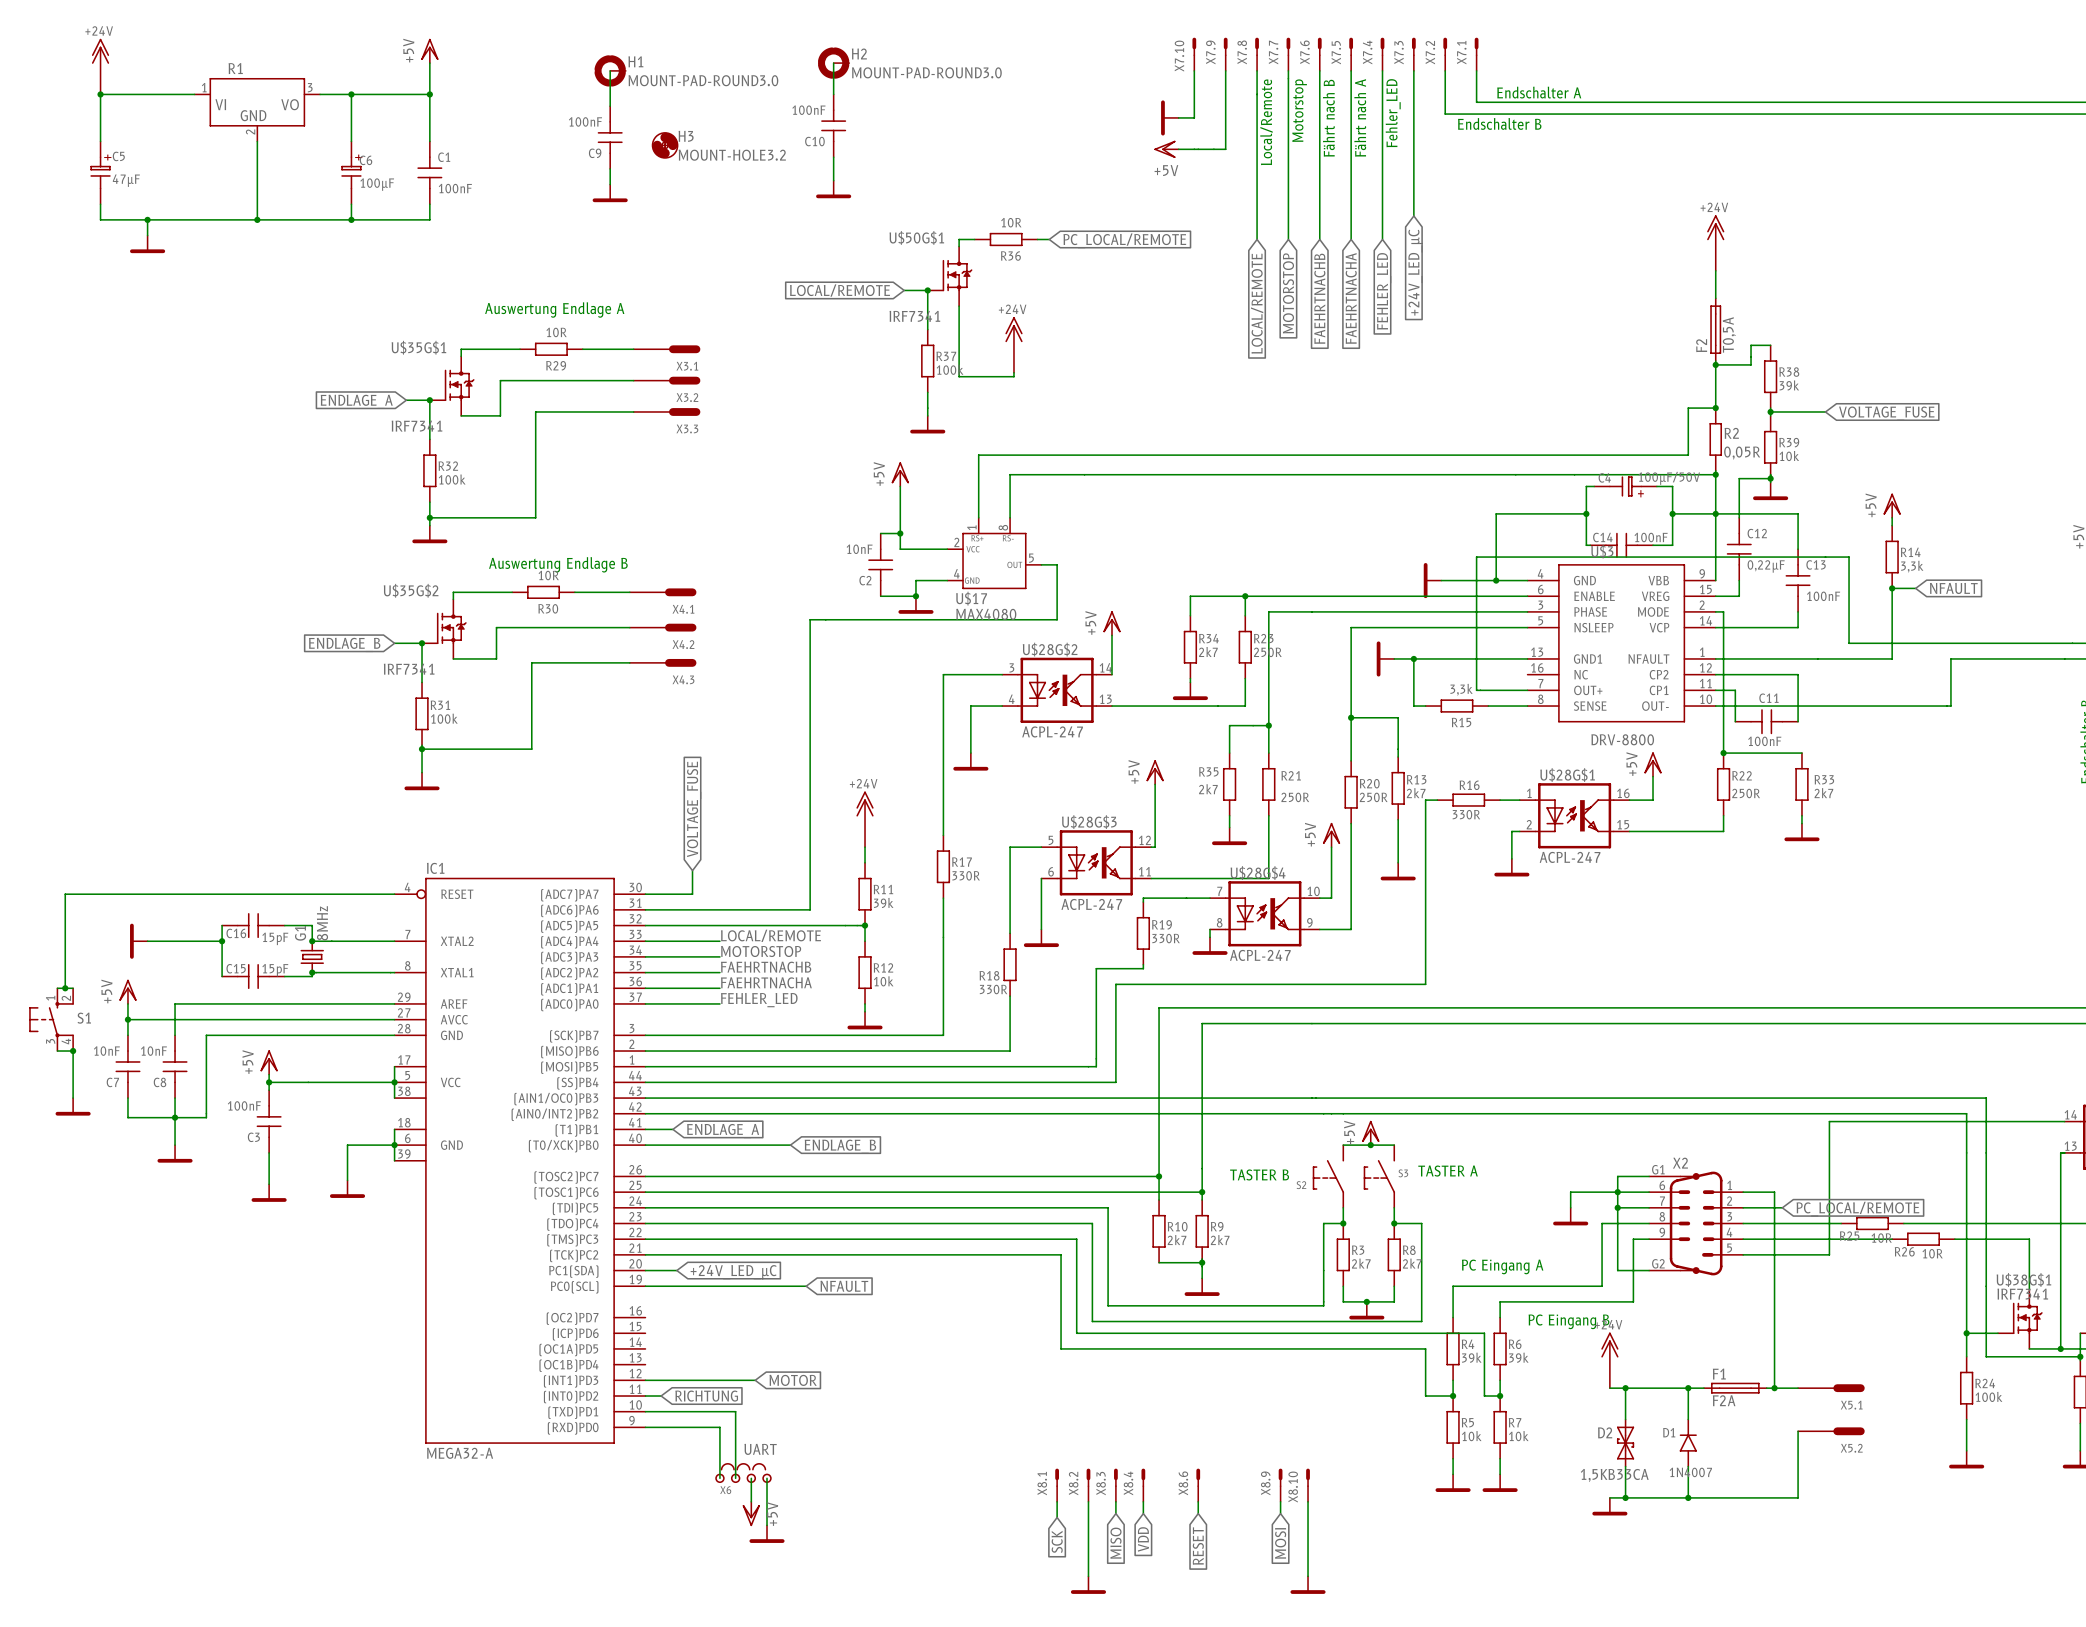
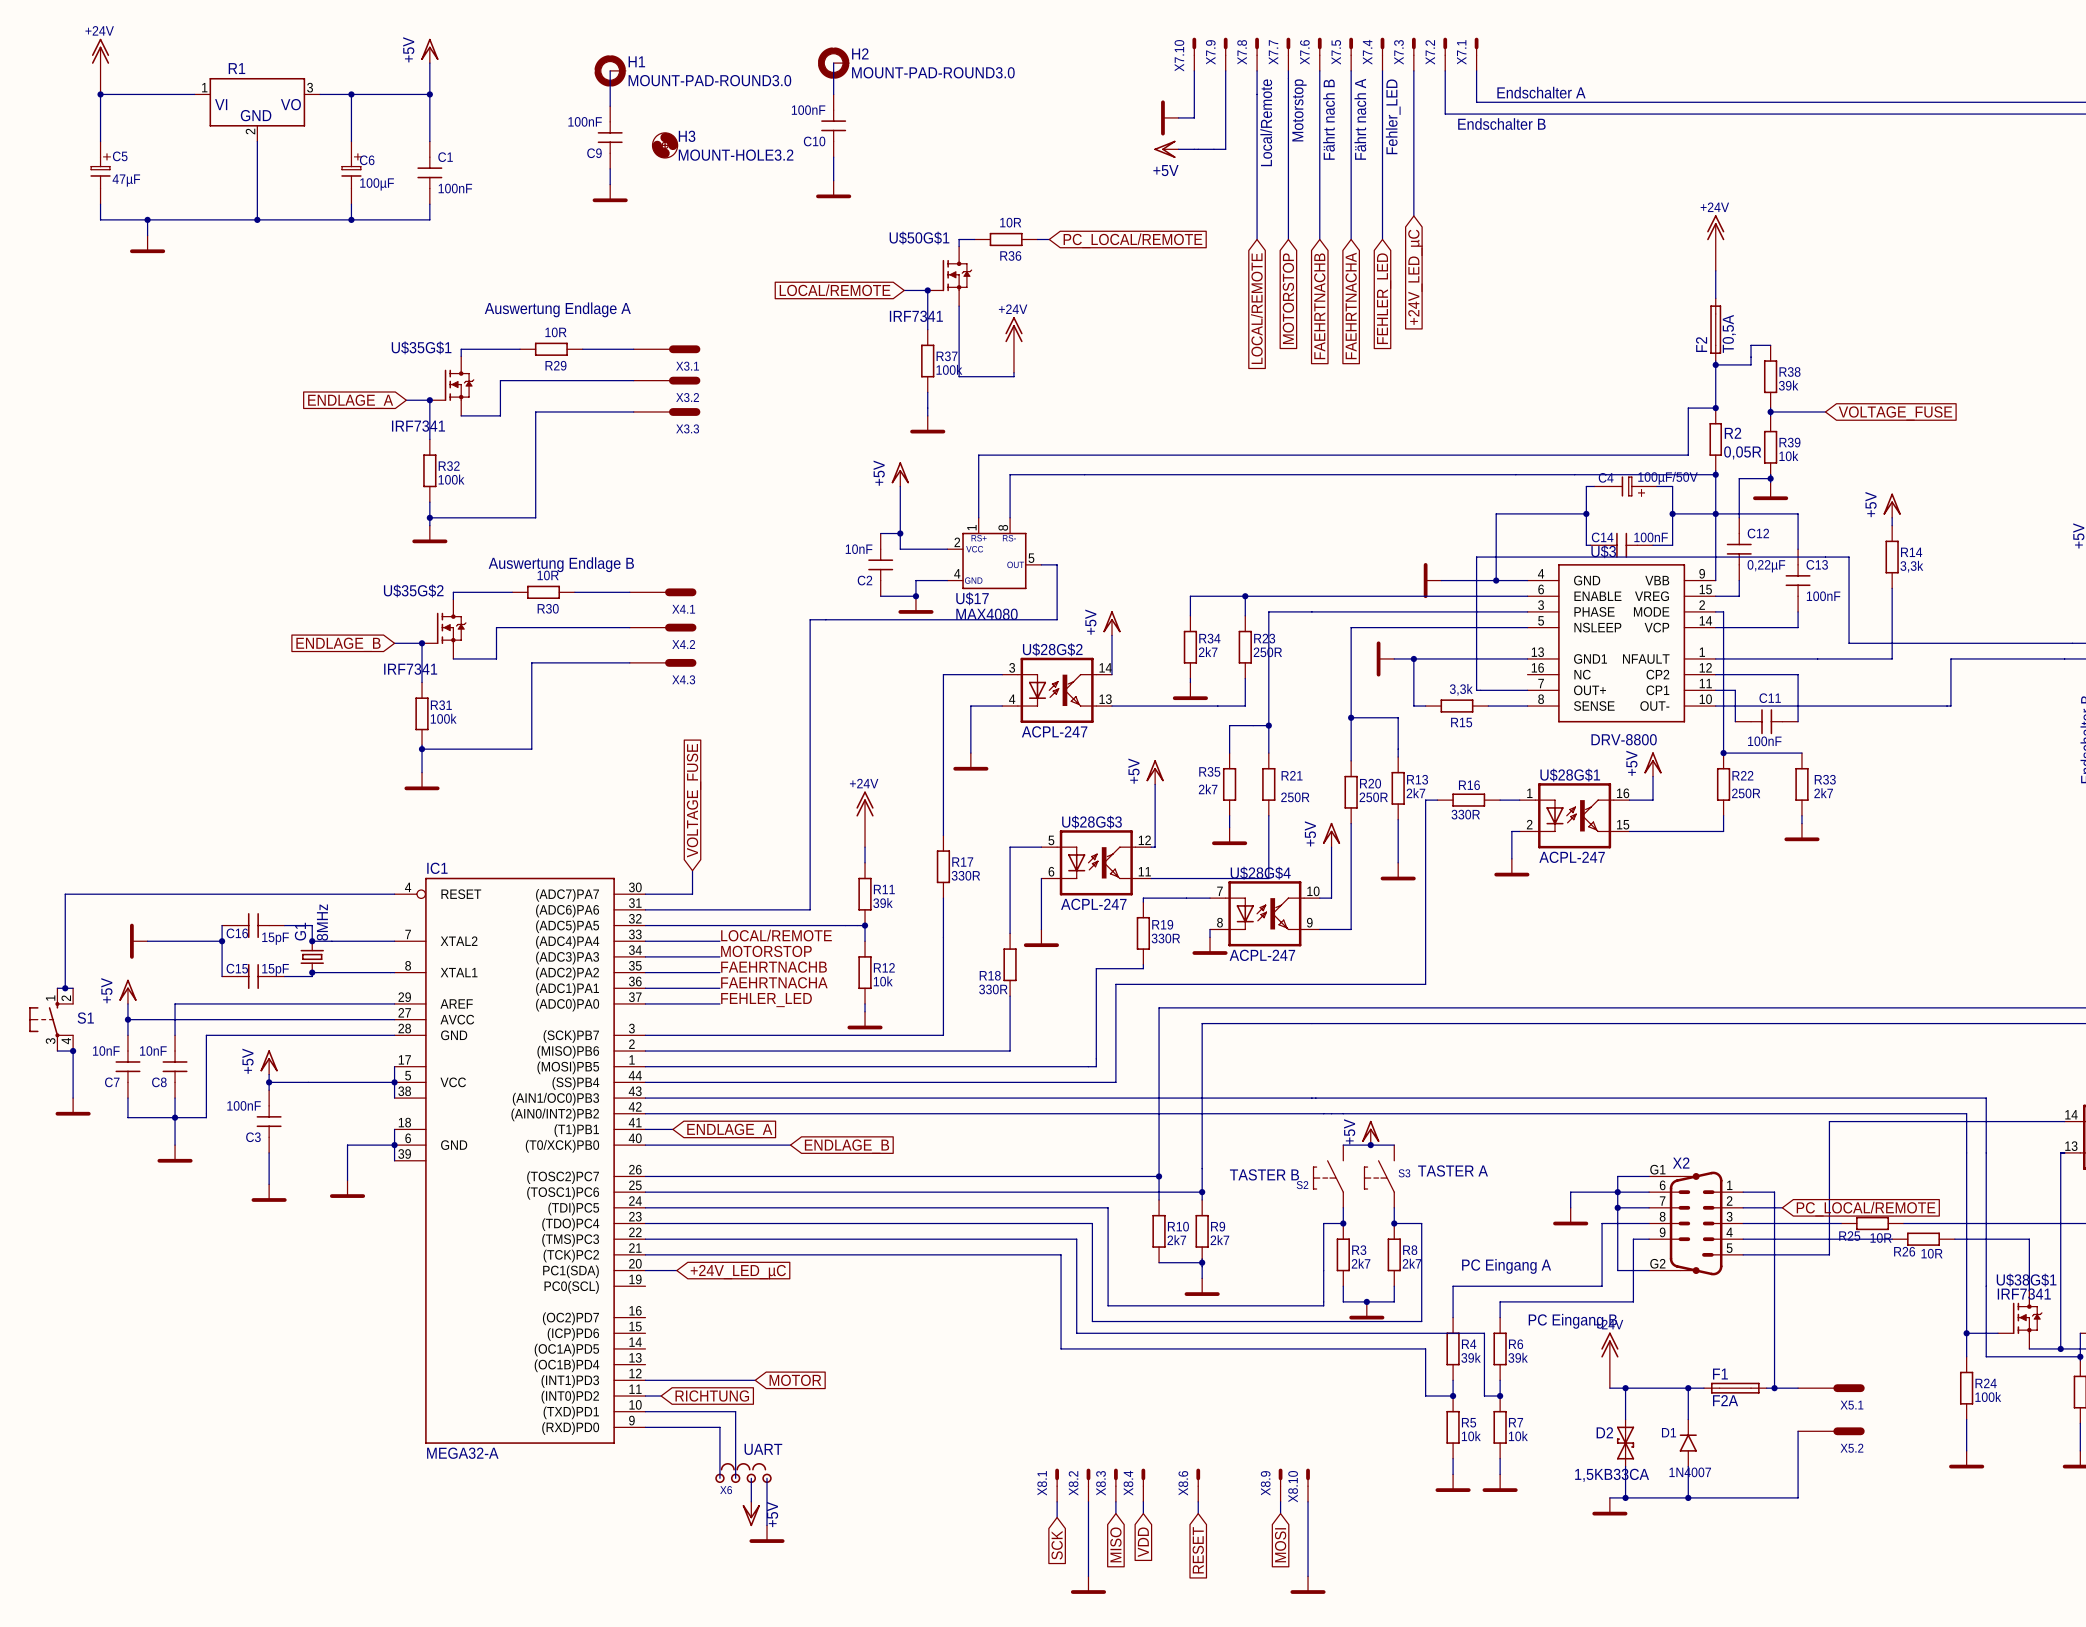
wire: (1892, 588) (1915, 588) -> none
junction: (1892, 588) -> none
global label: NFAULT (1953, 588) -> none
wire: (645, 1286) (806, 1286) -> none
global label: NFAULT (844, 1286) -> none

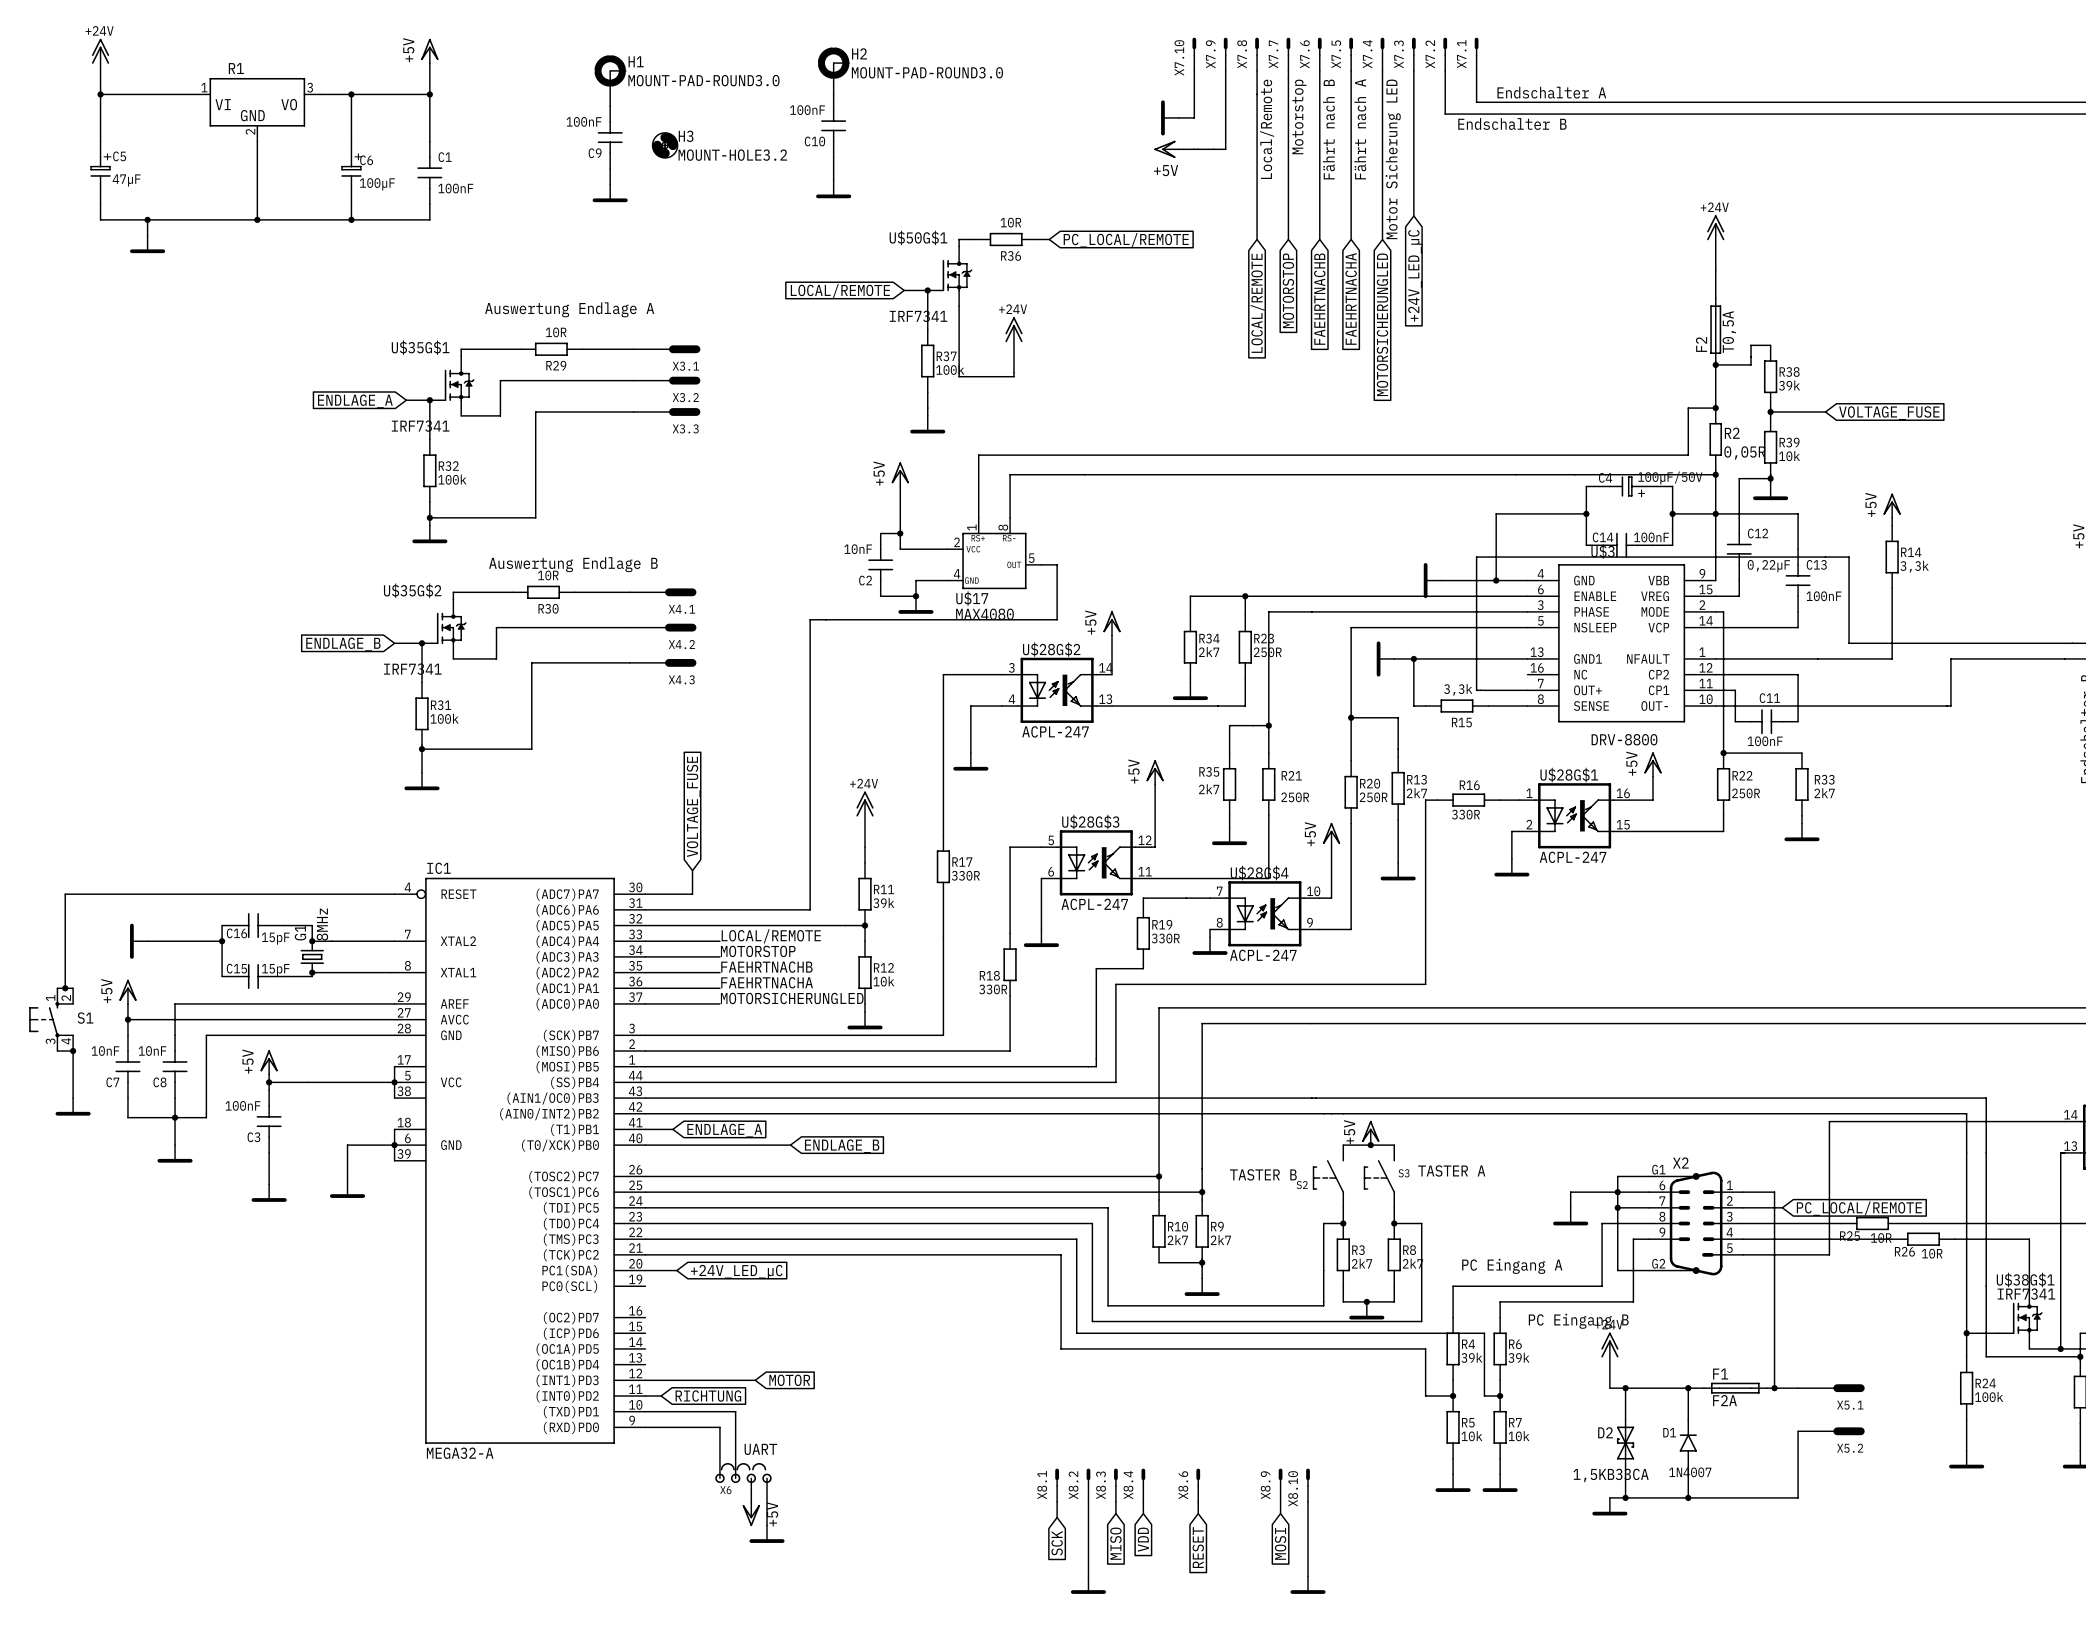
text: Fehler_LED (1393, 116) -> Motor Sicherung LED (1393, 159)
global label: FEHLER_LED (1384, 298) -> MOTORSICHERUNGLED (1382, 324)
label: FEHLER_LED (766, 1000) -> MOTORSICHERUNGLED (792, 998)

